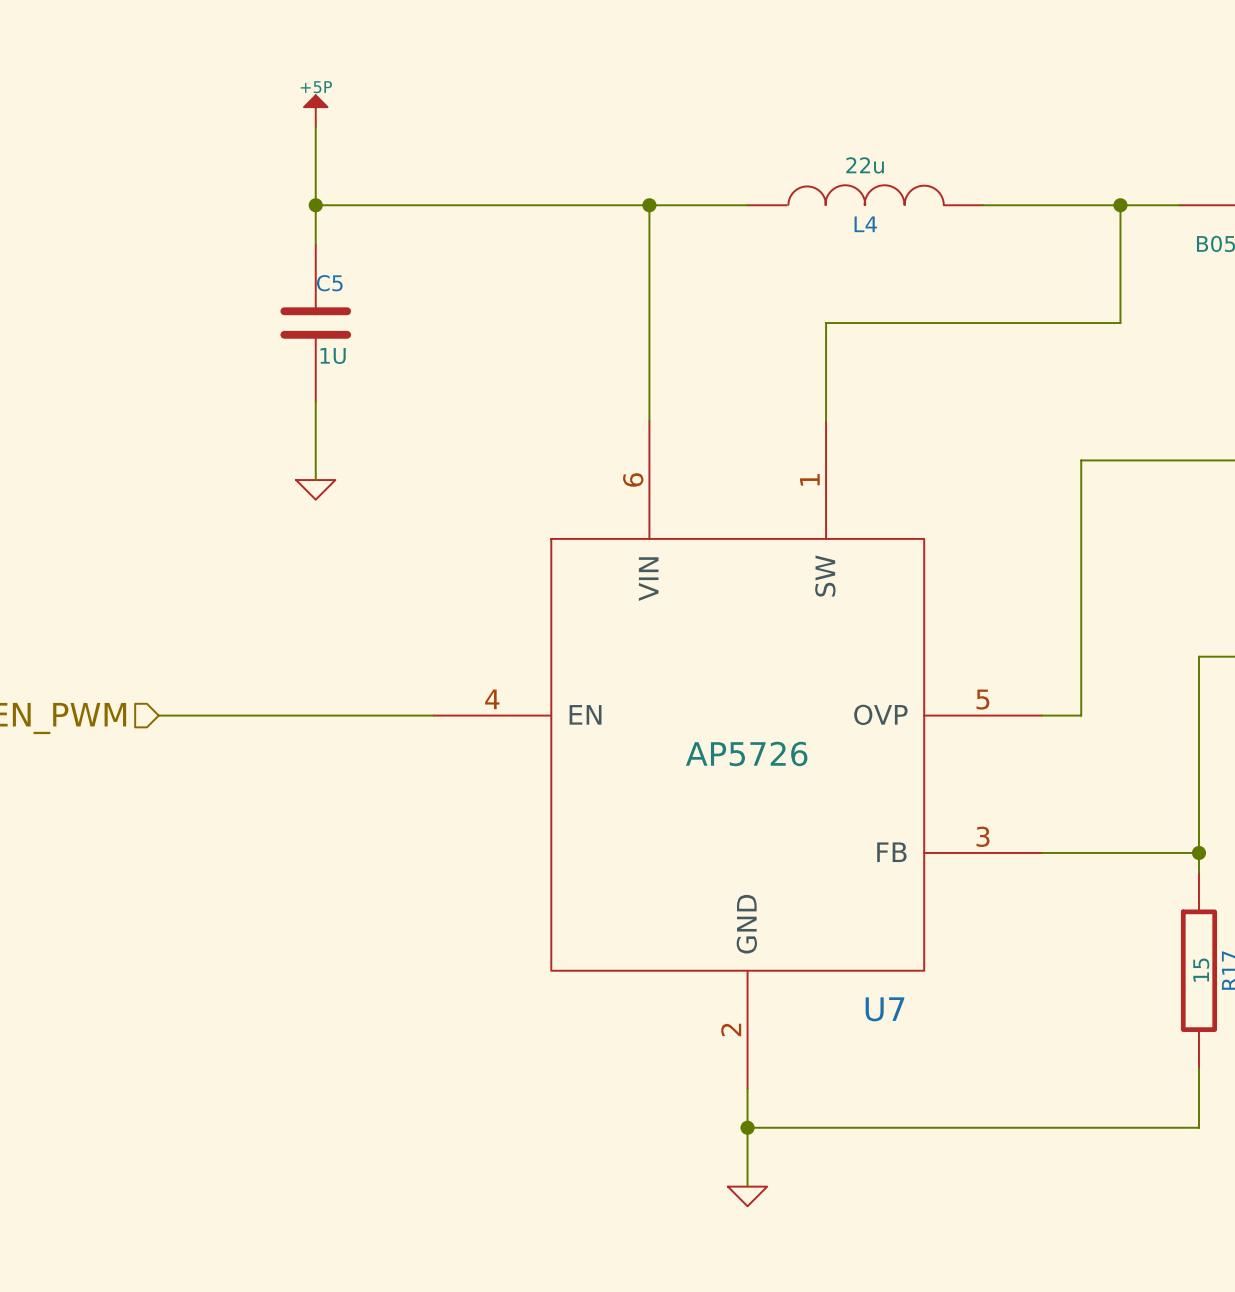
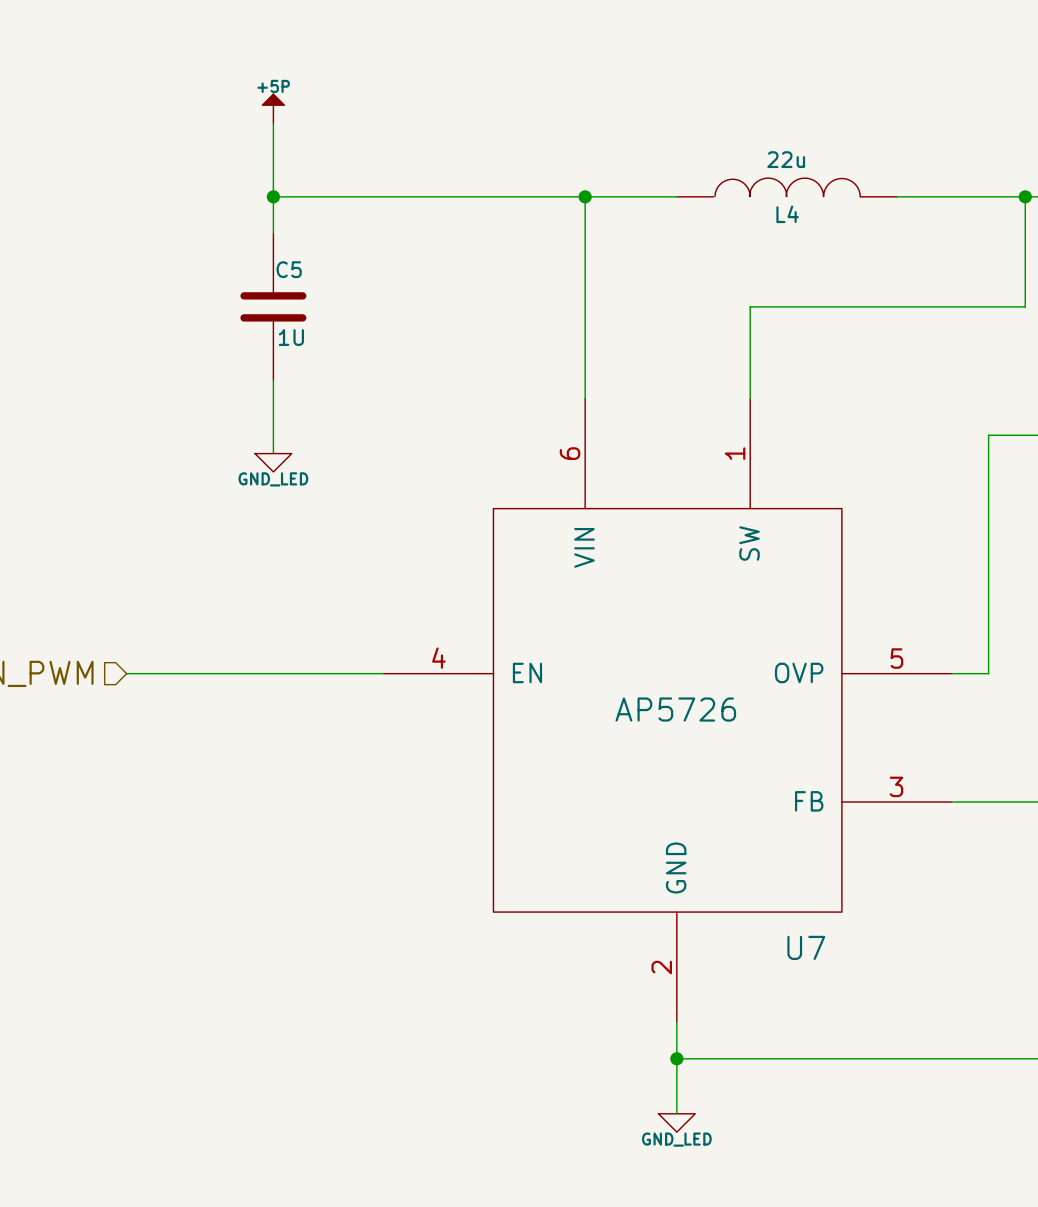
power symbol text: none -> GND_LED (273, 479)
power symbol text: none -> GND_LED (676, 1139)

